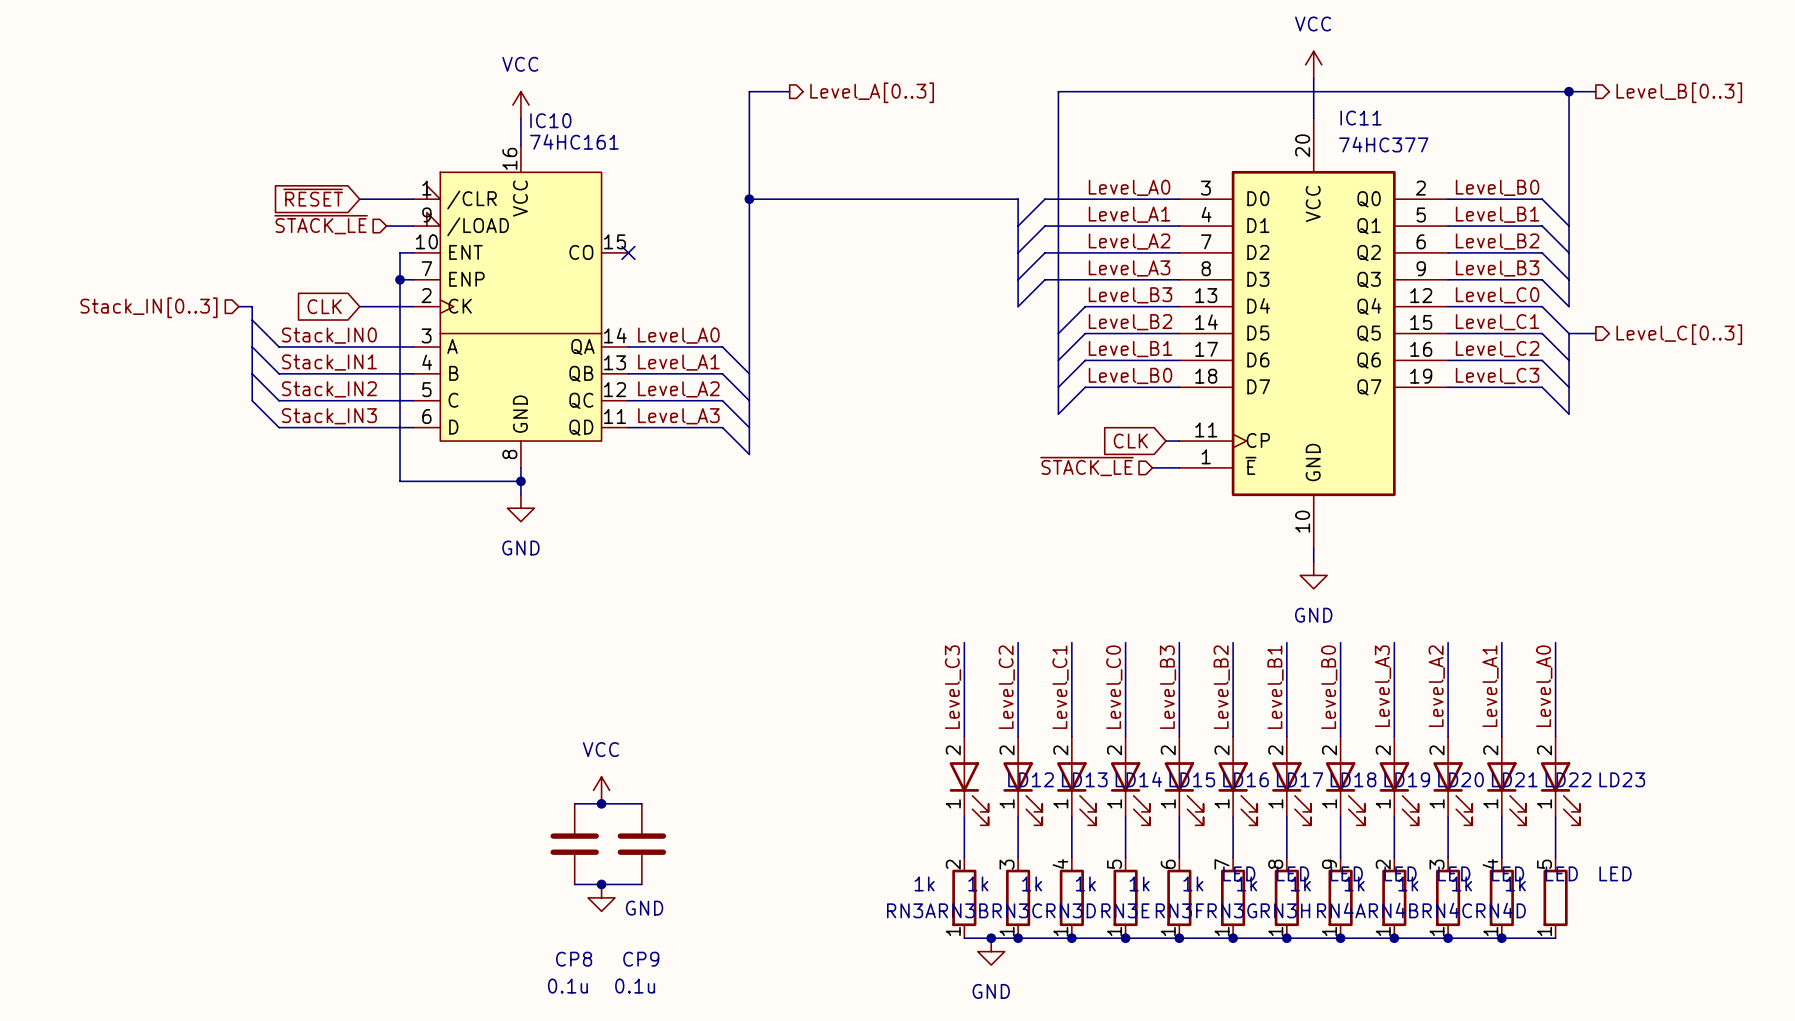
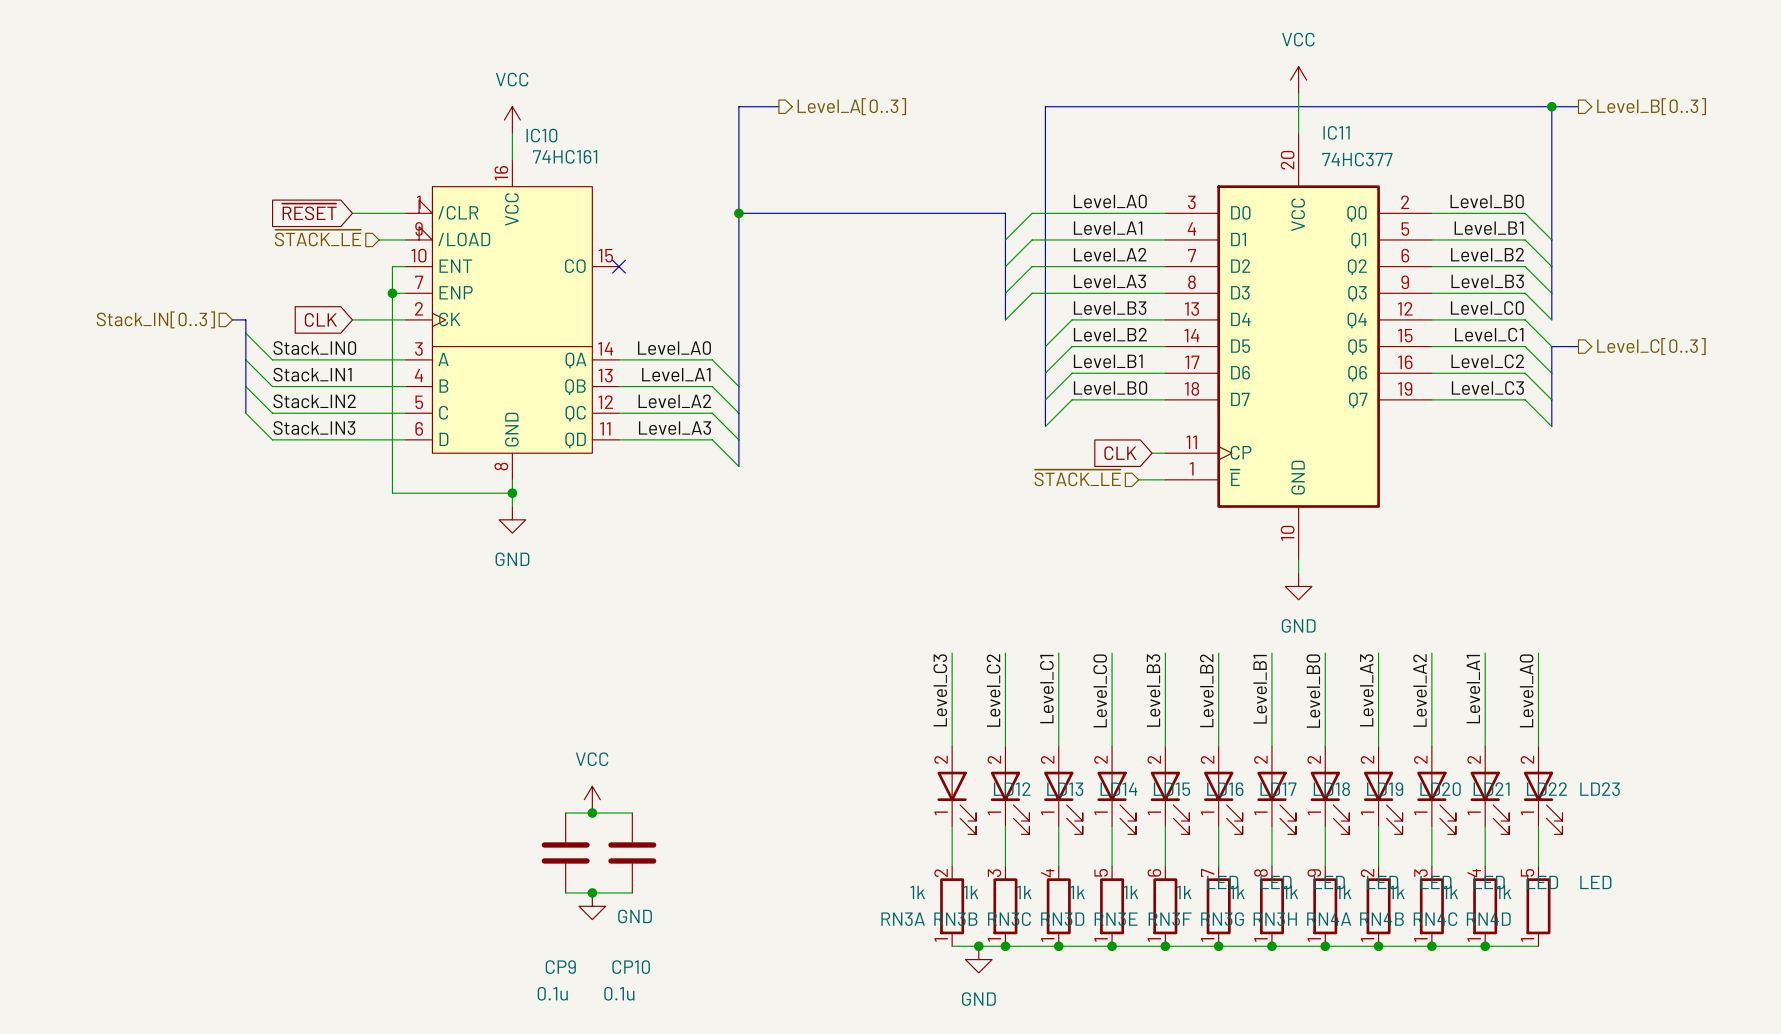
CP8 name: CP8 (574, 959) -> CP9 (560, 967)
CP9 name: CP9 (641, 959) -> CP10 (631, 967)

